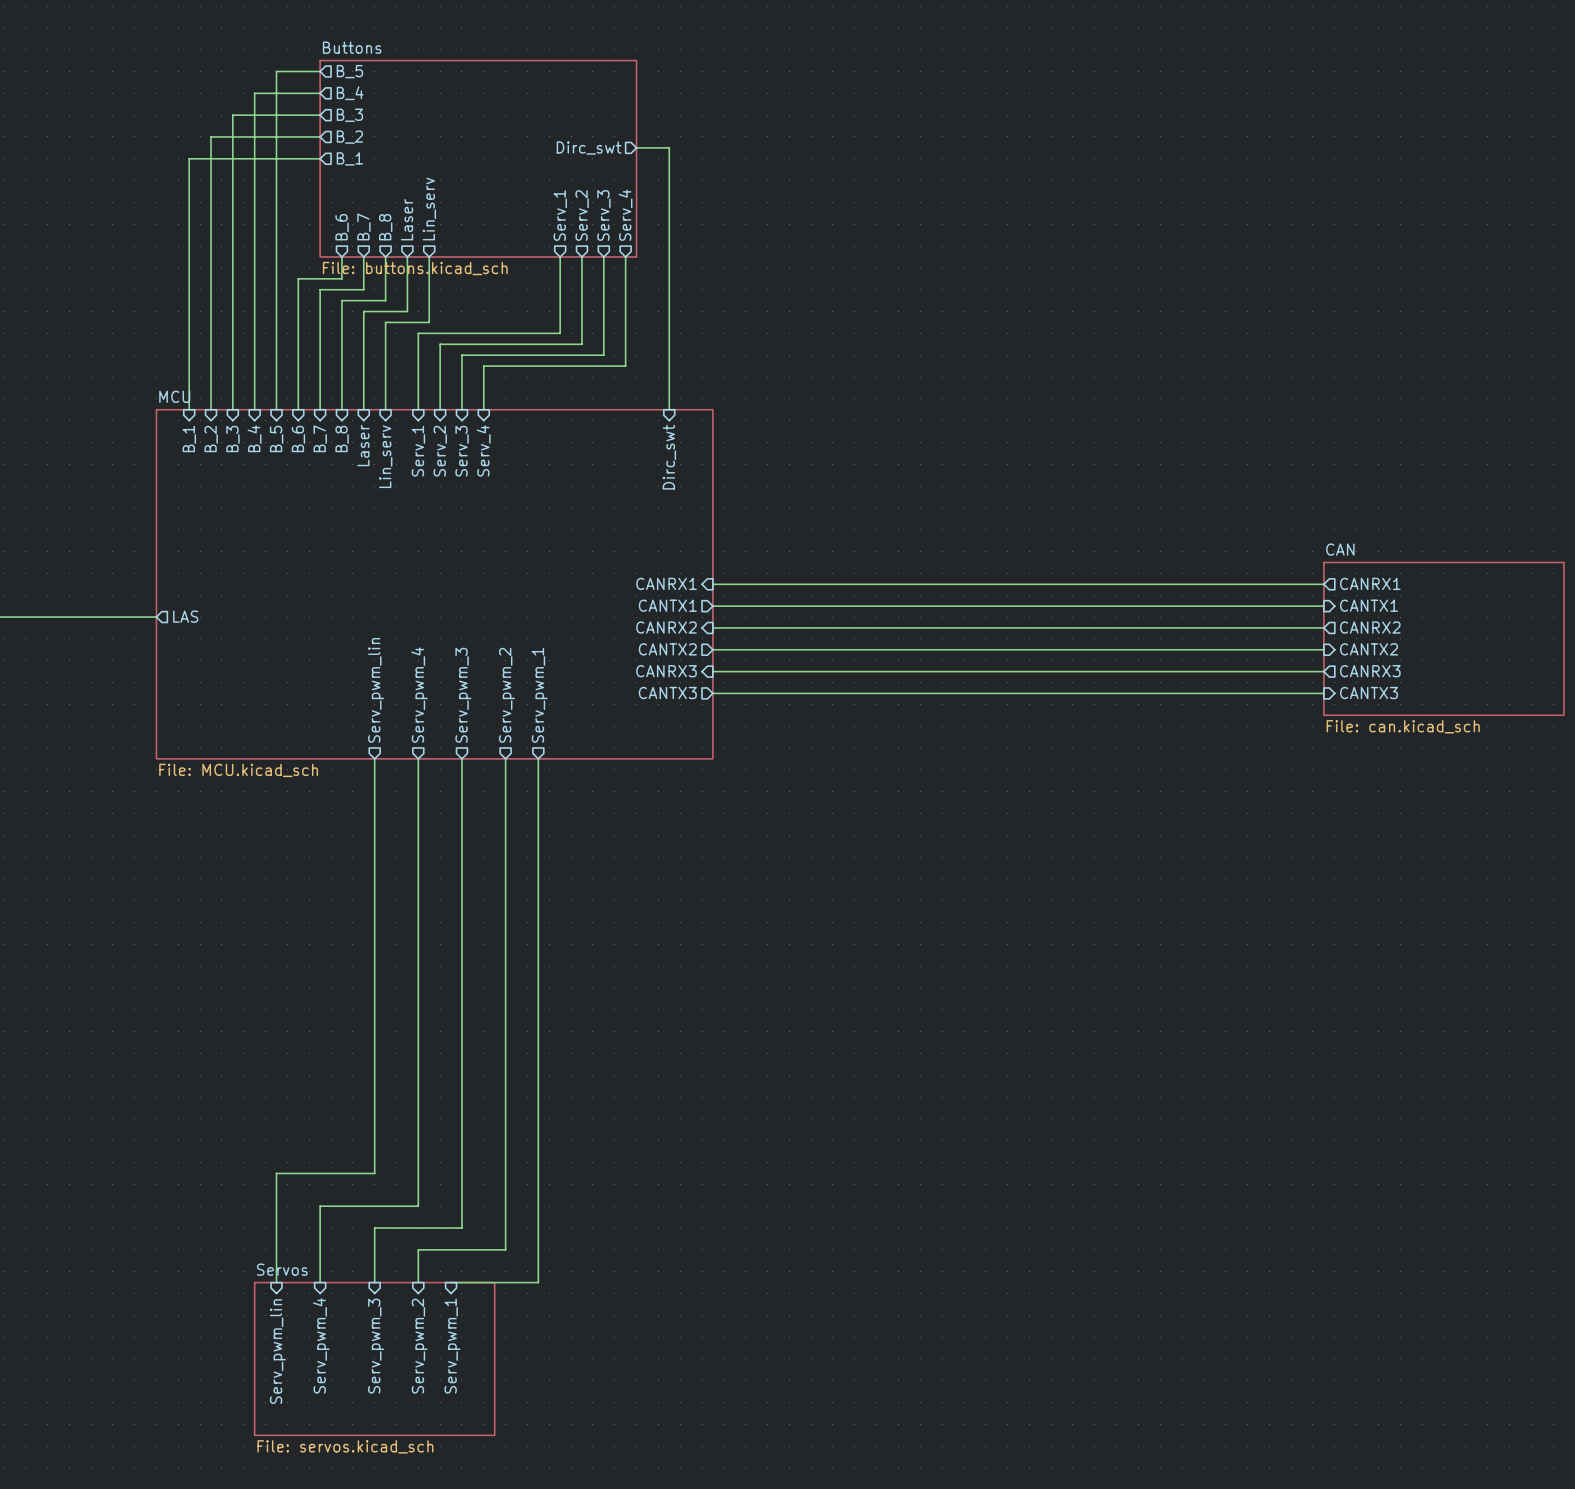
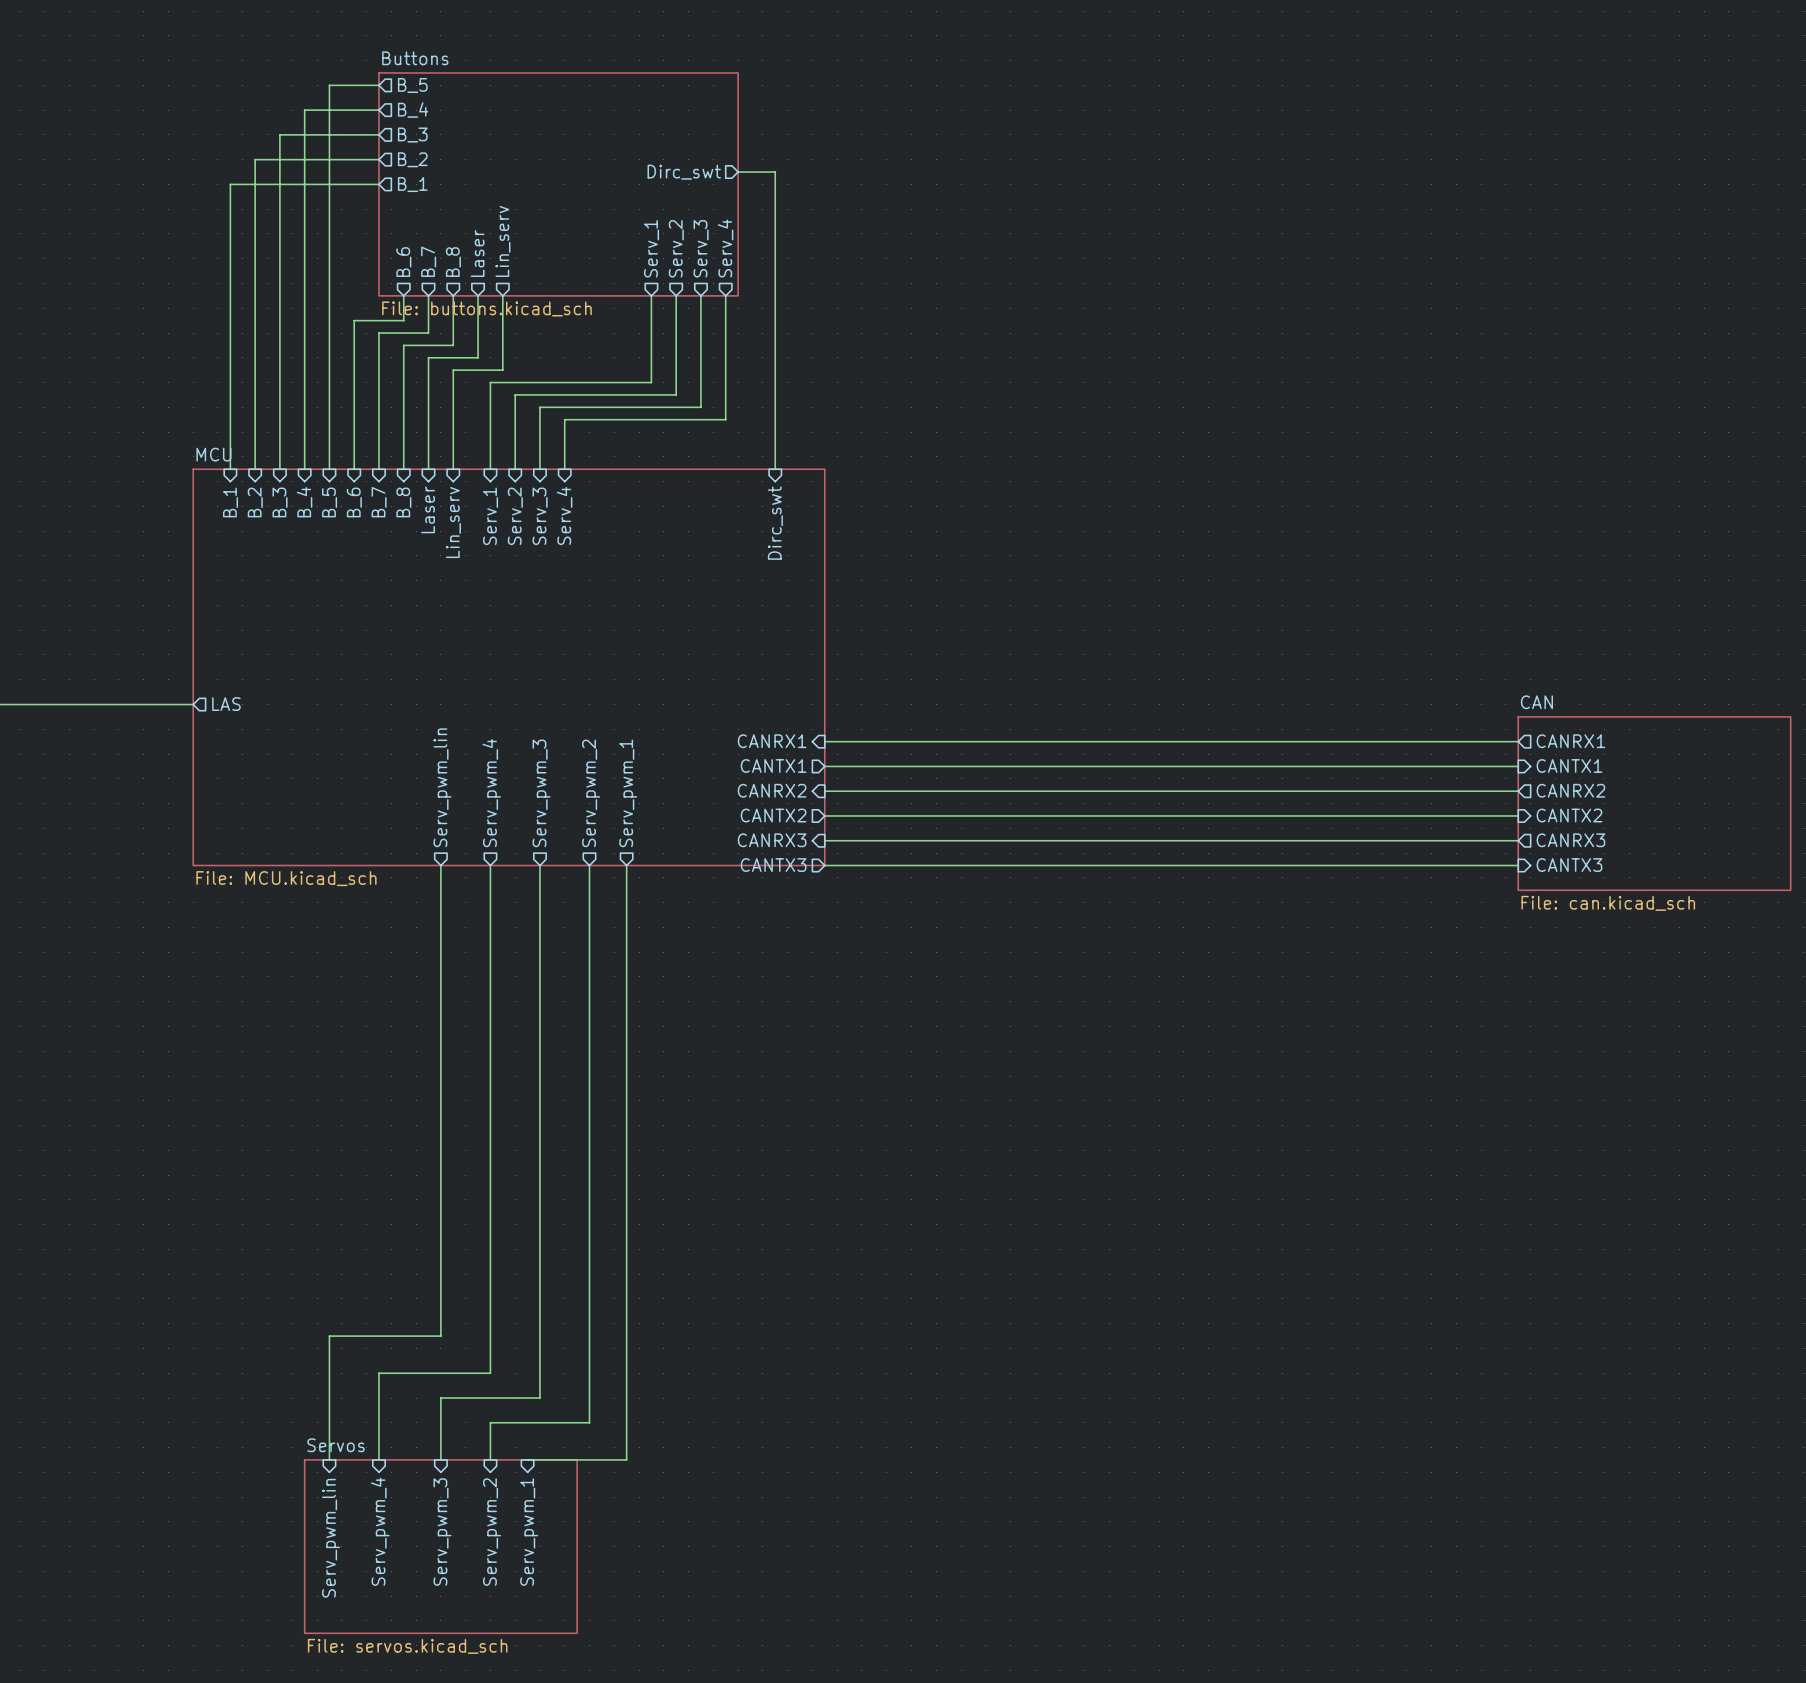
sheet pin: CANRX1 (666, 583) -> none
sheet pin: CANRX1 (1370, 583) -> none
wire: (712, 584) (1323, 584) -> (824, 815) (1518, 815)
sheet pin: CANTX1 (667, 605) -> none
sheet pin: CANTX1 (1369, 605) -> none
wire: (712, 606) (1323, 606) -> (824, 840) (1518, 840)
sheet pin: CANRX2 (666, 627) -> none
wire: (712, 627) (1323, 627) -> (824, 865) (1518, 865)
sheet pin: CANRX2 (1370, 627) -> none
sheet CAN position: (1443, 638) -> (1654, 803)
sheet pin shape: output (667, 649) -> input (772, 741)
sheet pin: CANTX2 (667, 649) -> CANRX1 (772, 741)
sheet pin shape: input (1369, 649) -> output (1570, 741)
sheet pin: CANTX2 (1369, 649) -> CANRX1 (1570, 741)
sheet pin shape: input (666, 671) -> output (773, 765)
sheet pin: CANRX3 (666, 671) -> CANTX1 (773, 765)
sheet pin shape: output (1370, 671) -> input (1569, 765)
sheet pin: CANRX3 (1370, 671) -> CANTX1 (1569, 765)
sheet pin shape: output (667, 693) -> input (772, 790)
sheet pin: CANTX3 (667, 693) -> CANRX2 (772, 790)
sheet pin shape: input (1369, 693) -> output (1570, 790)
sheet pin: CANTX3 (1369, 693) -> CANRX2 (1570, 790)
sheet pin: none -> CANTX2 (773, 815)
sheet pin: none -> CANTX2 (1569, 815)
sheet pin: none -> CANRX3 (772, 840)
sheet pin: none -> CANRX3 (1570, 840)
sheet pin: none -> CANTX3 (773, 865)
sheet pin: none -> CANTX3 (1569, 865)

